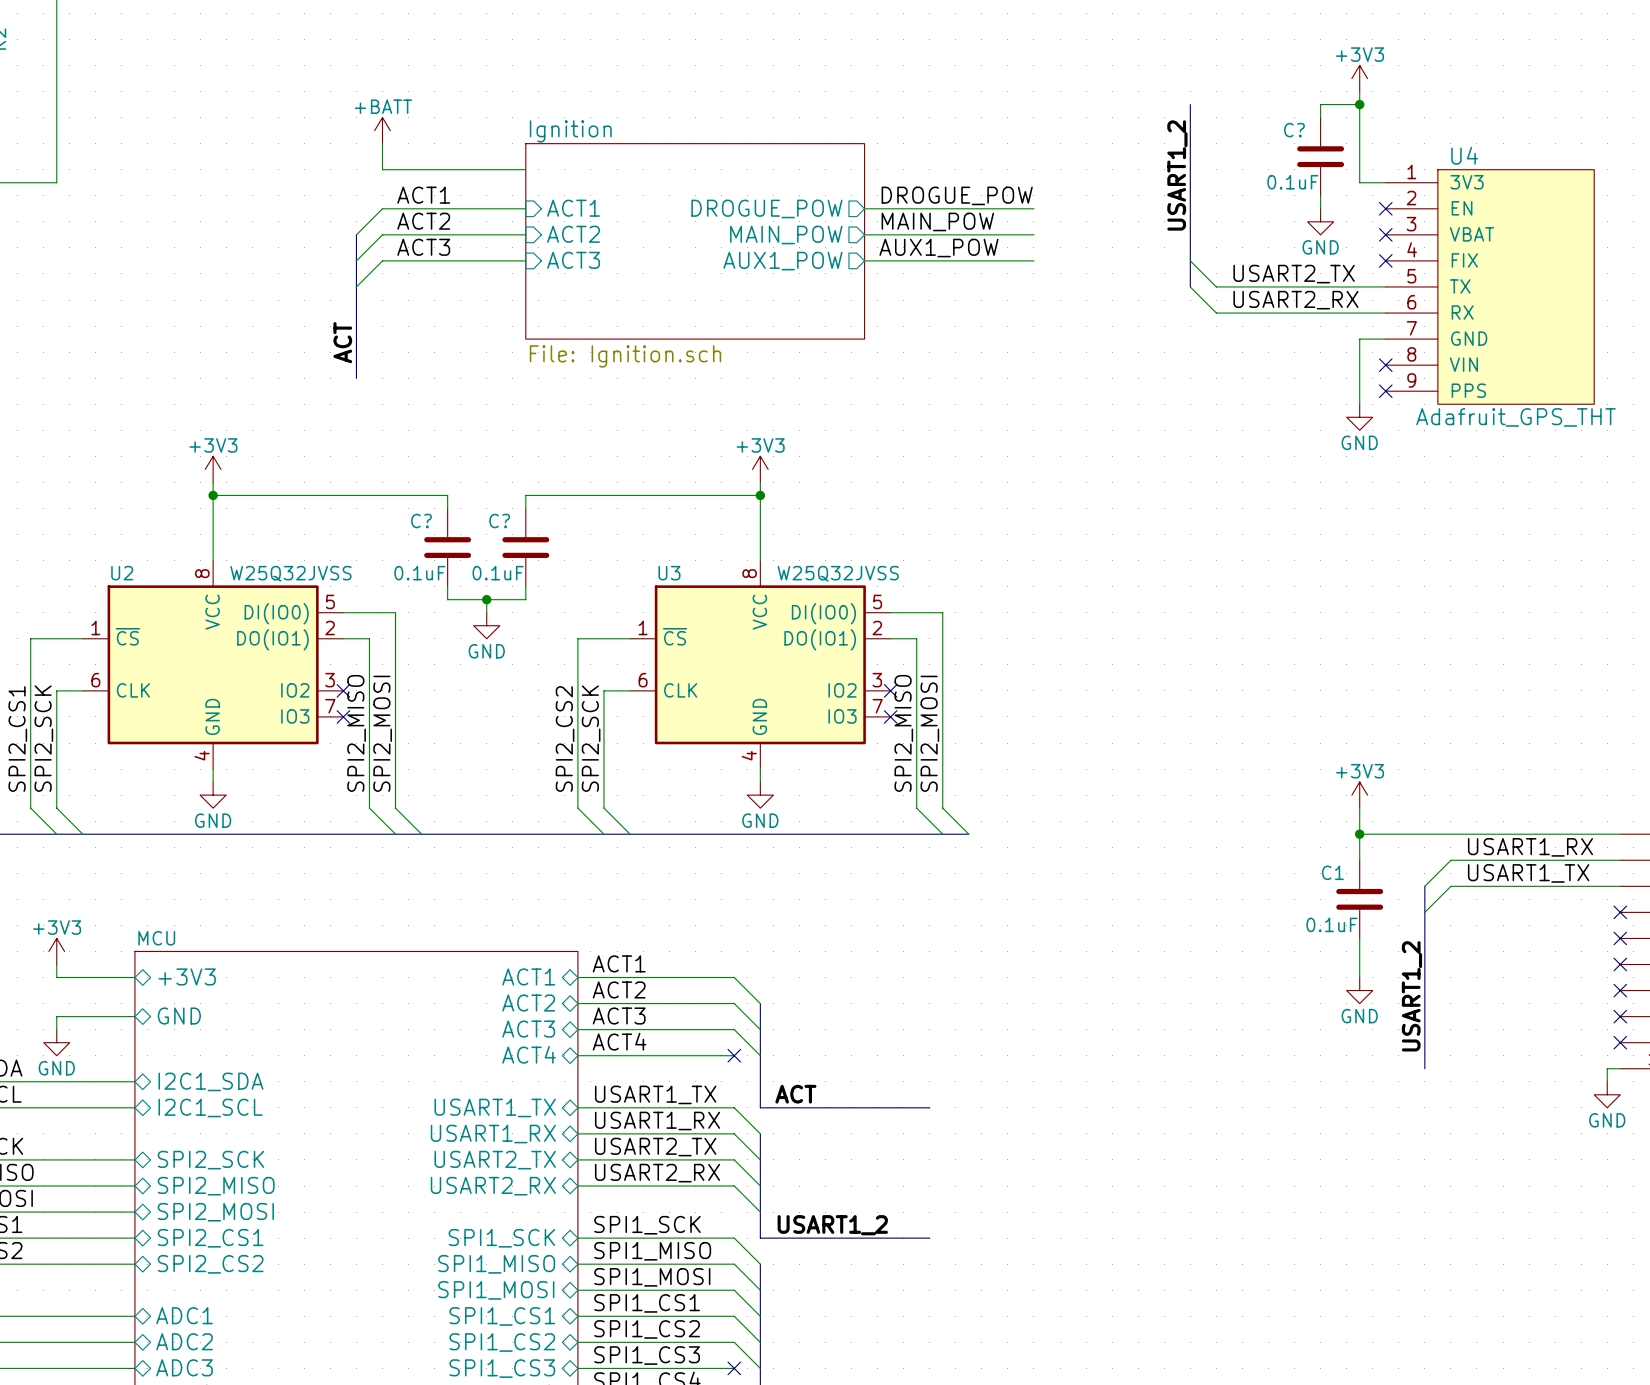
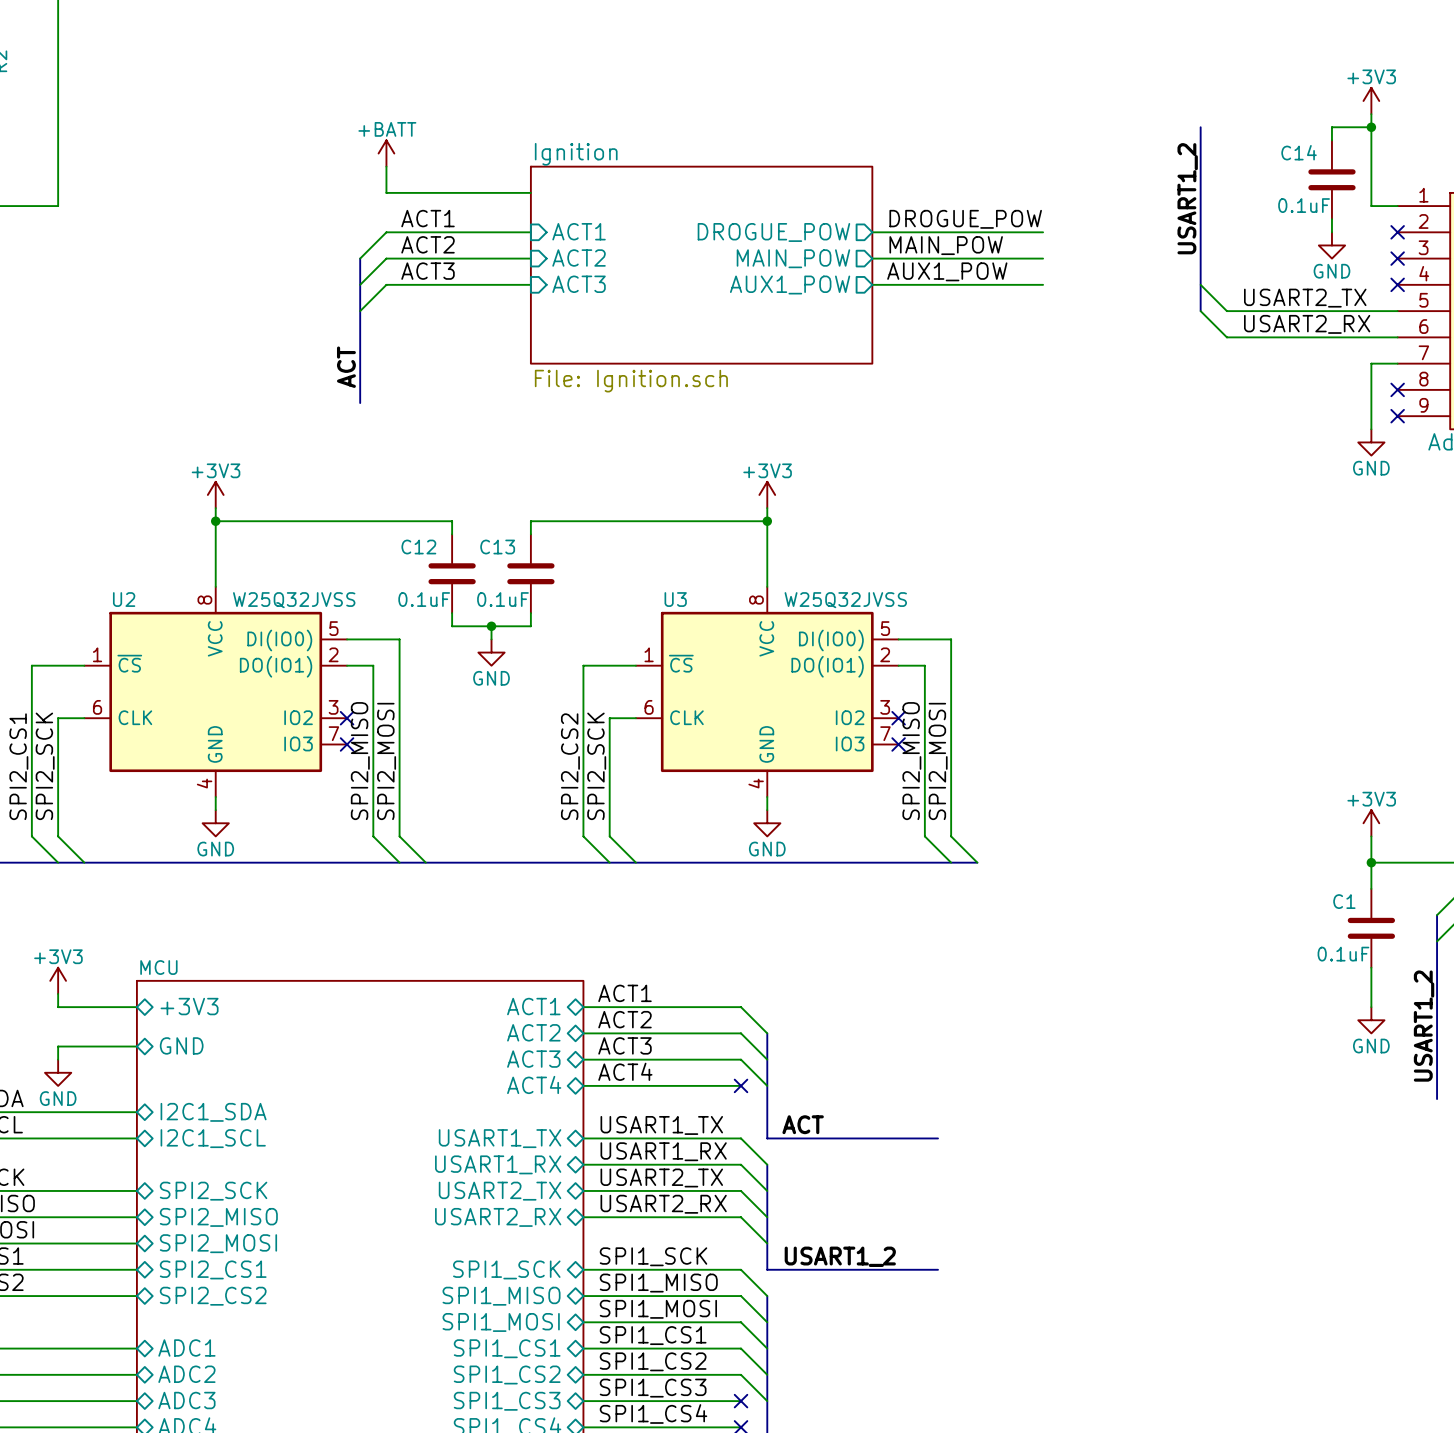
C? name: C? (1294, 130) -> C14 (1299, 152)
C? name: C? (421, 521) -> C12 (418, 547)
C? name: C? (499, 521) -> C13 (497, 547)

